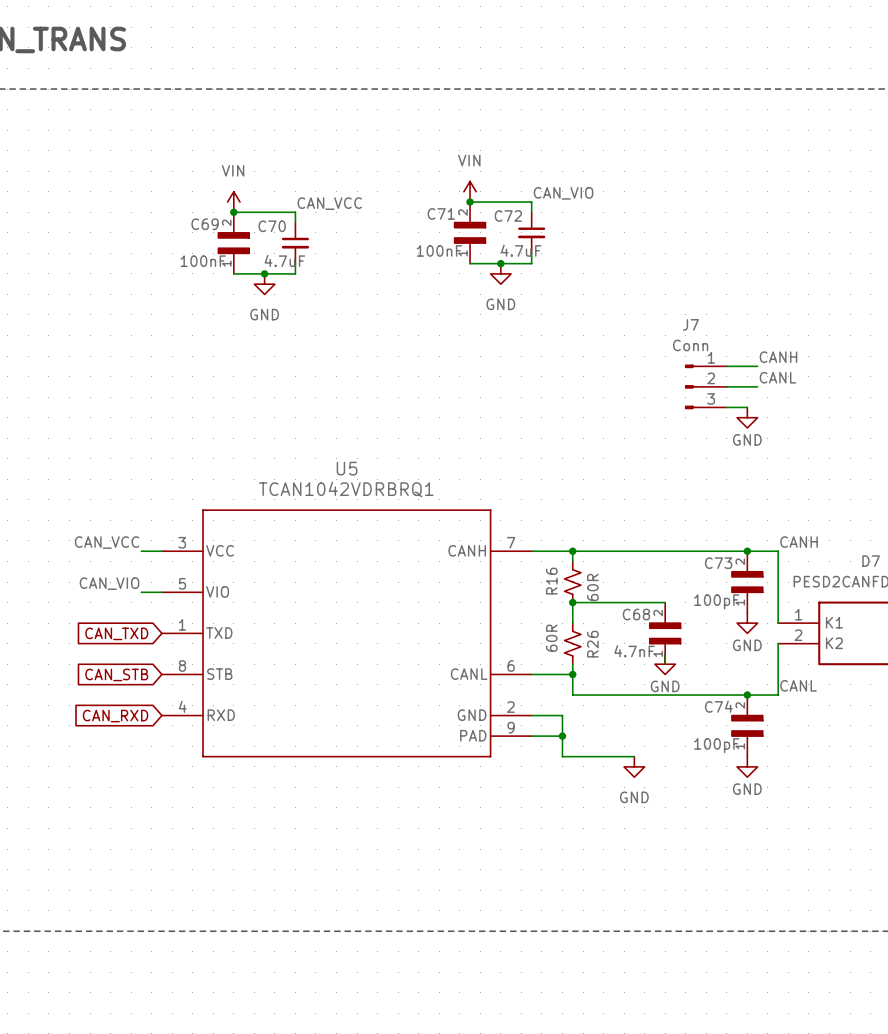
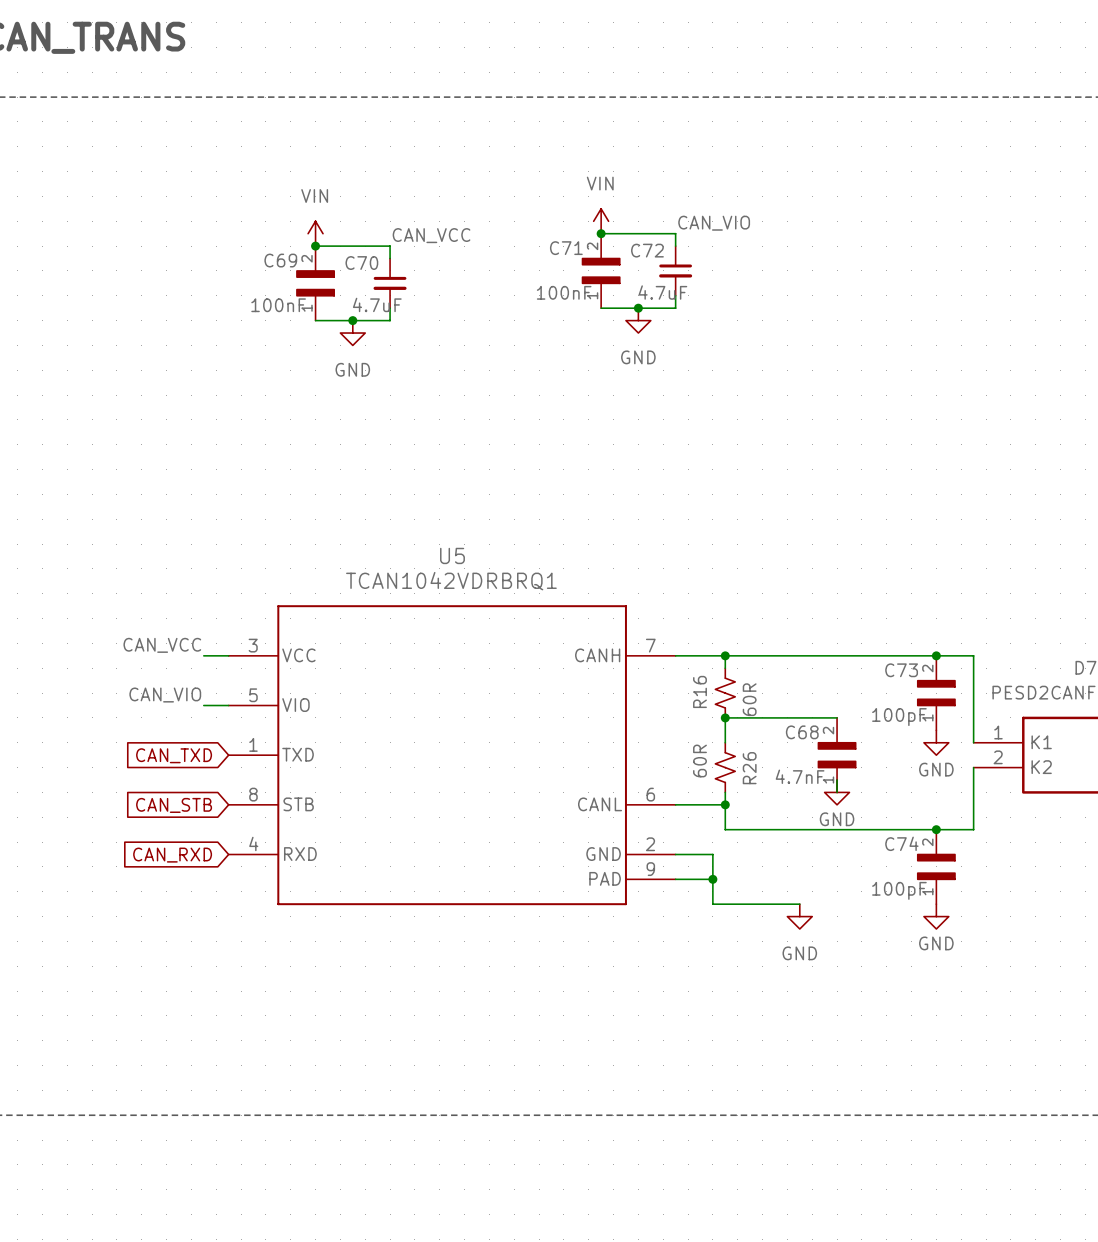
label: CANH (778, 357) -> none
wire: (726, 366) (757, 366) -> none
label: CANL (777, 377) -> none
J7: Conn (705, 386) -> none
wire: (726, 386) (757, 386) -> none
wire: (726, 407) (747, 407) -> none
power symbol: GND (747, 417) -> none
label: CANH (799, 542) -> none
label: CANL (798, 685) -> none

